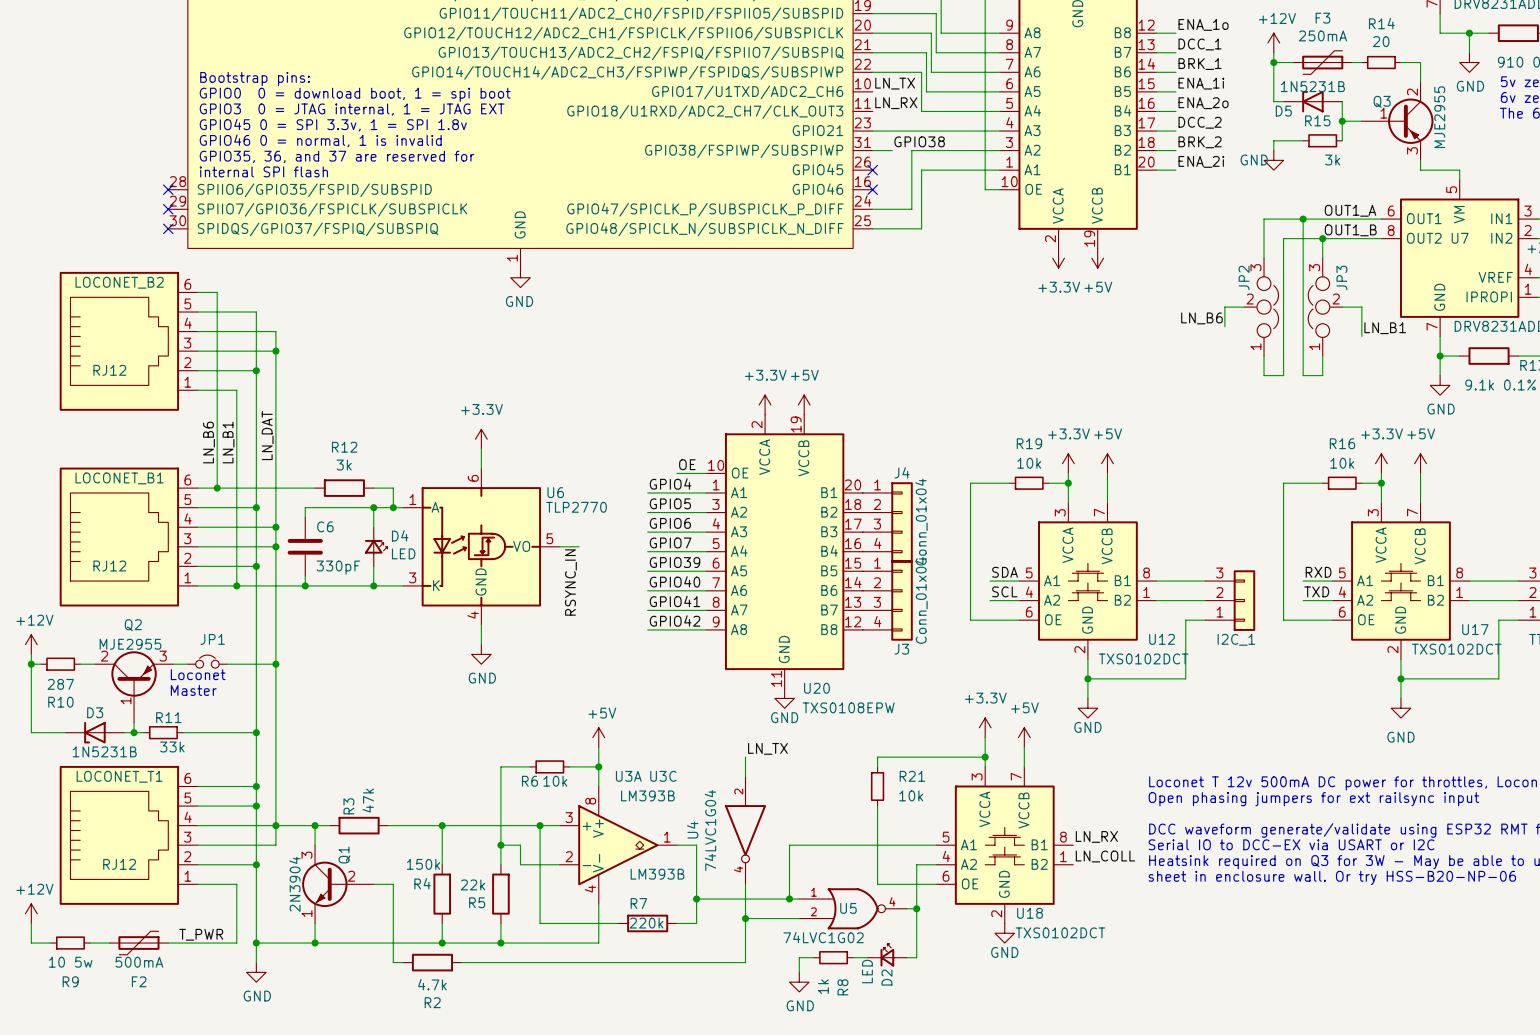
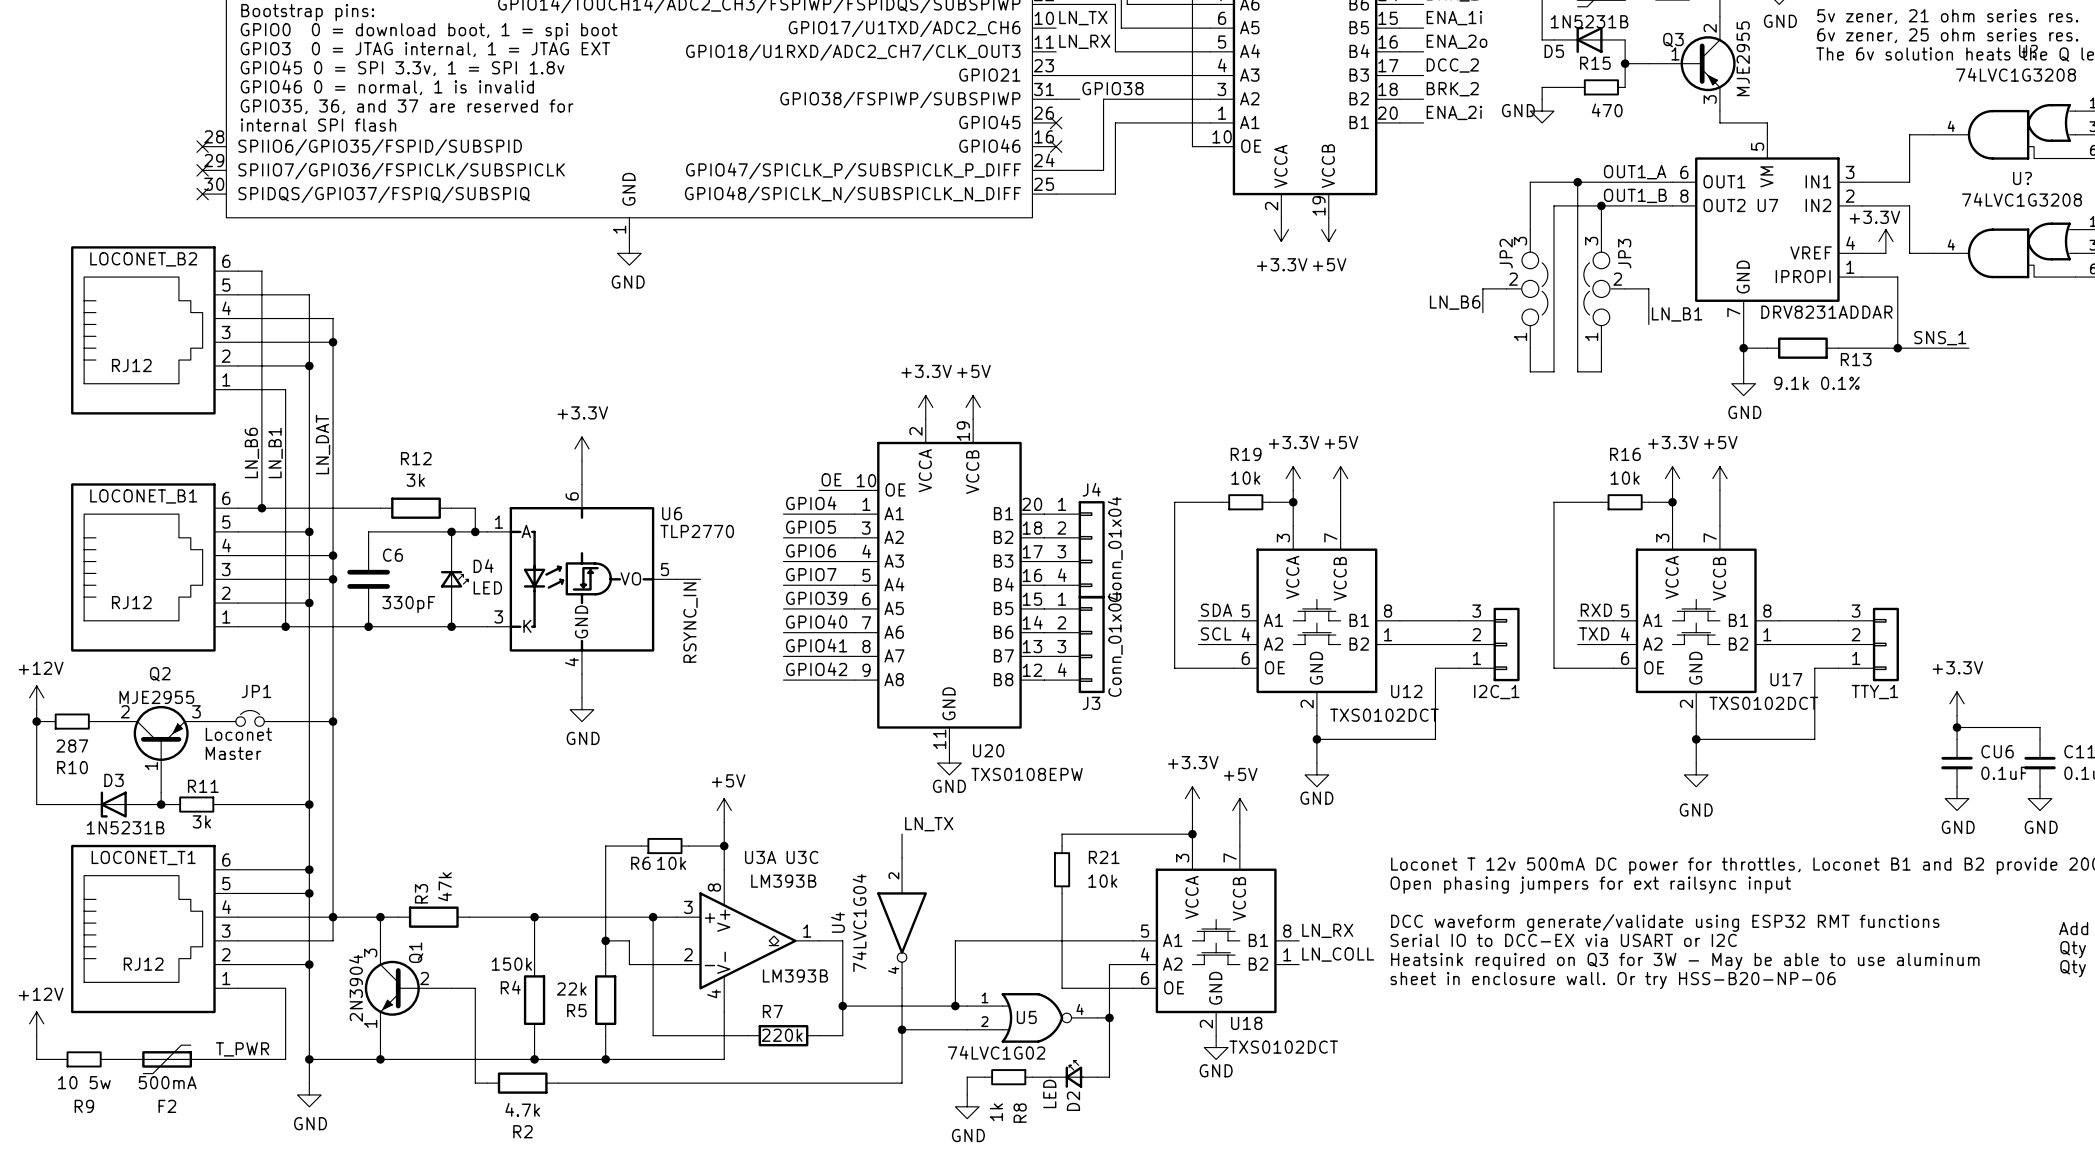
R15 value: 3k (1332, 160) -> 470 (1607, 110)
R11 value: 33k (172, 746) -> 3k (201, 821)

